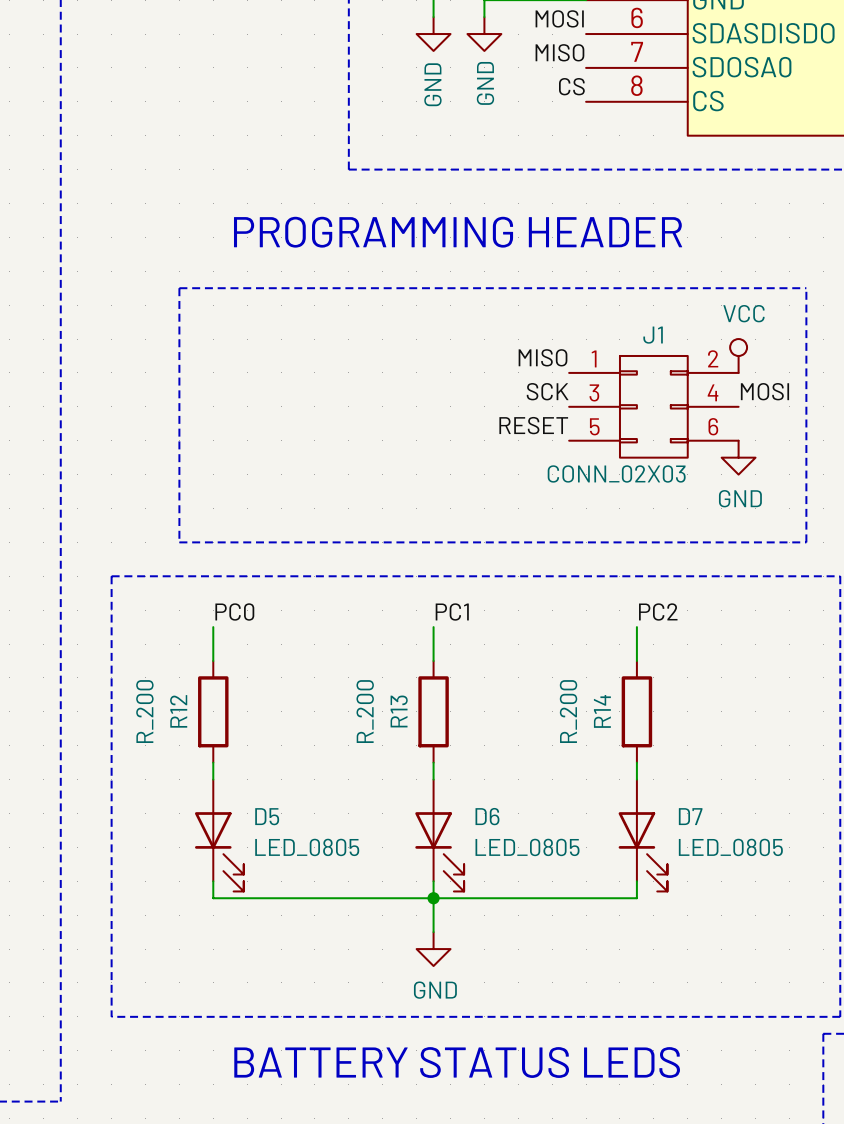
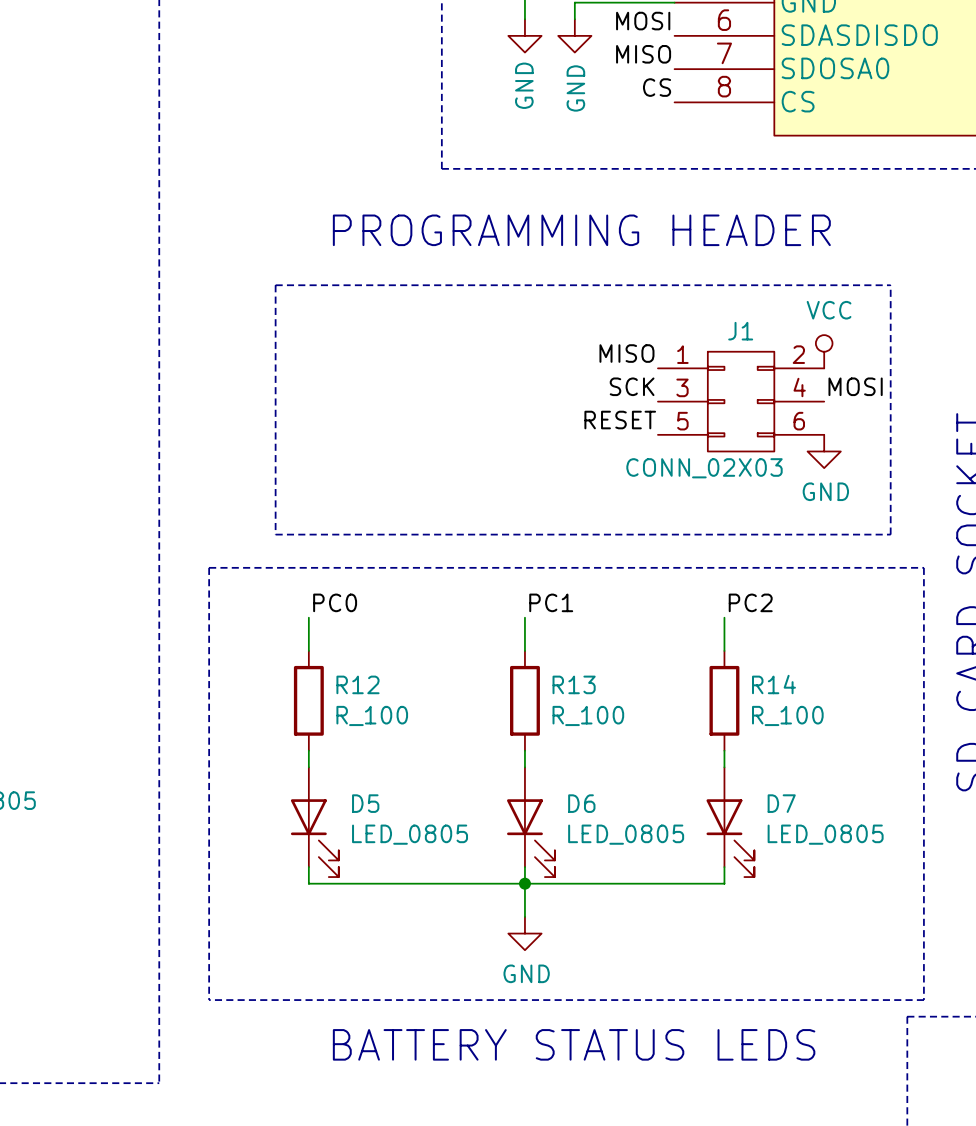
R12 value: R_200 (144, 711) -> R_100 (372, 715)
R12 name rotation: 0° (178, 711) -> 90° clockwise (357, 684)
R12 name position: R12 (178, 711) -> R12 (357, 684)
R13 value: R_200 (365, 711) -> R_100 (588, 715)
R13 name rotation: 0° (399, 711) -> 90° clockwise (574, 684)
R13 name position: R13 (399, 711) -> R13 (574, 684)
R14 value: R_200 (568, 711) -> R_100 (787, 715)
R14 name rotation: 0° (602, 711) -> 90° clockwise (773, 684)
R14 name position: R14 (602, 711) -> R14 (773, 684)

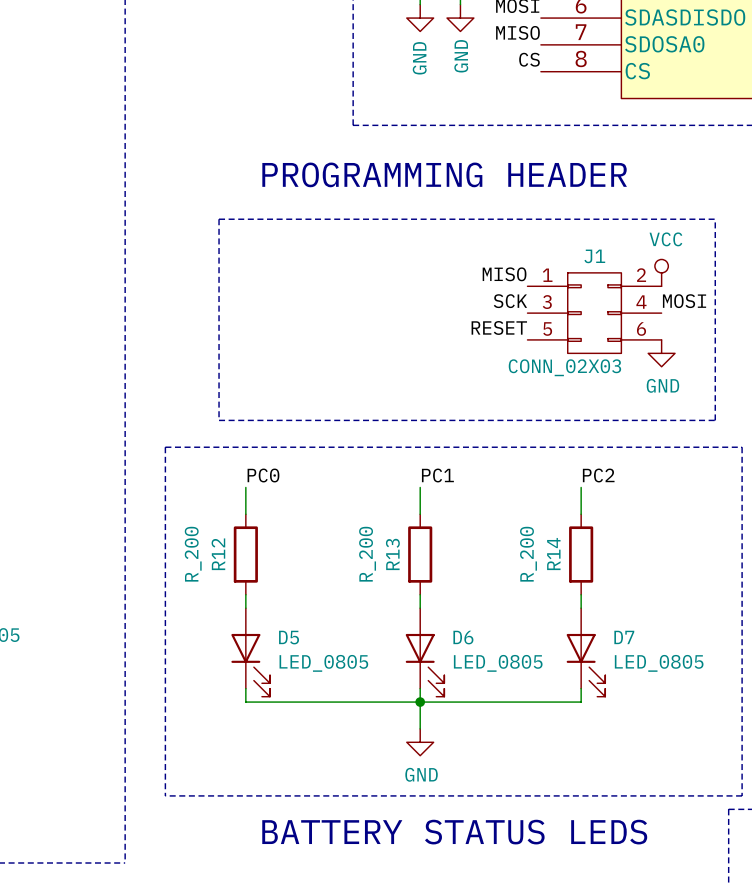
R12 name rotation: 0° (357, 684) -> 90° counterclockwise (218, 554)
R12 name position: R12 (357, 684) -> R12 (218, 554)
R13 name rotation: 0° (574, 684) -> 90° counterclockwise (392, 554)
R13 name position: R13 (574, 684) -> R13 (392, 554)
R14 name rotation: 0° (773, 684) -> 90° counterclockwise (553, 554)
R14 name position: R14 (773, 684) -> R14 (553, 554)
R12 value: R_100 (372, 715) -> R_200 (193, 554)
R13 value: R_100 (588, 715) -> R_200 (367, 554)
R14 value: R_100 (787, 715) -> R_200 (528, 554)

